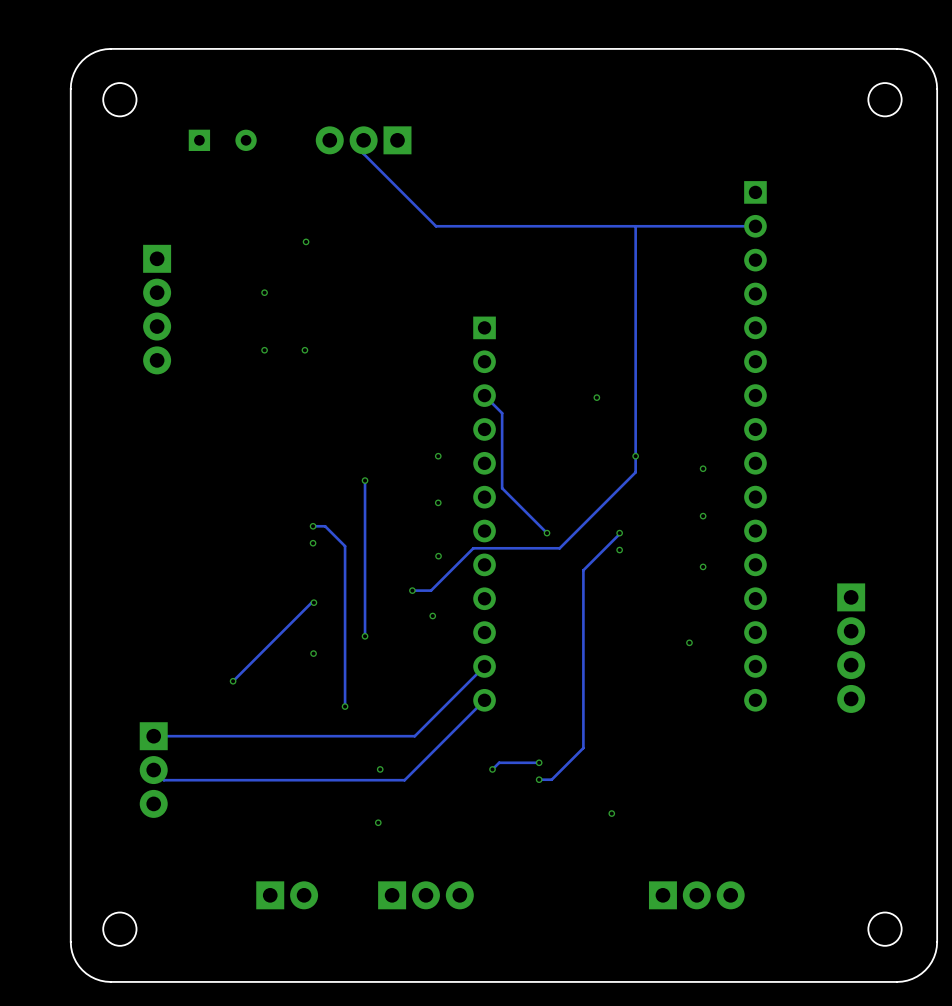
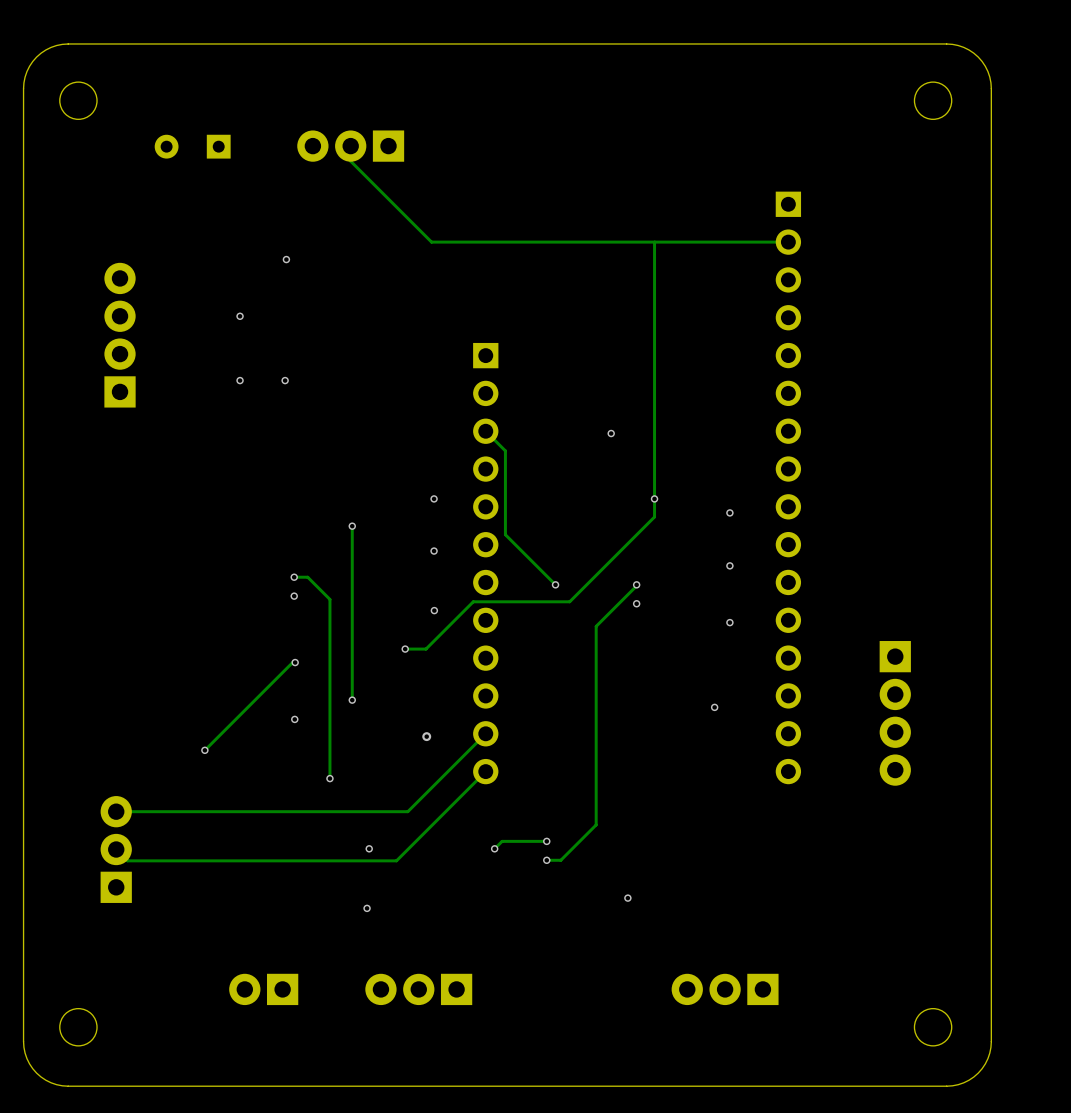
part rotation: 0° (222, 140) -> 180° (192, 146)
part rotation: 0° (157, 309) -> 180° (120, 335)
via: (432, 616) -> none
via: none -> (426, 736)
part rotation: 0° (153, 770) -> 180° (116, 849)
part rotation: 0° (287, 895) -> 180° (263, 989)
part rotation: 0° (425, 895) -> 180° (418, 989)
part rotation: 0° (696, 895) -> 180° (725, 989)

